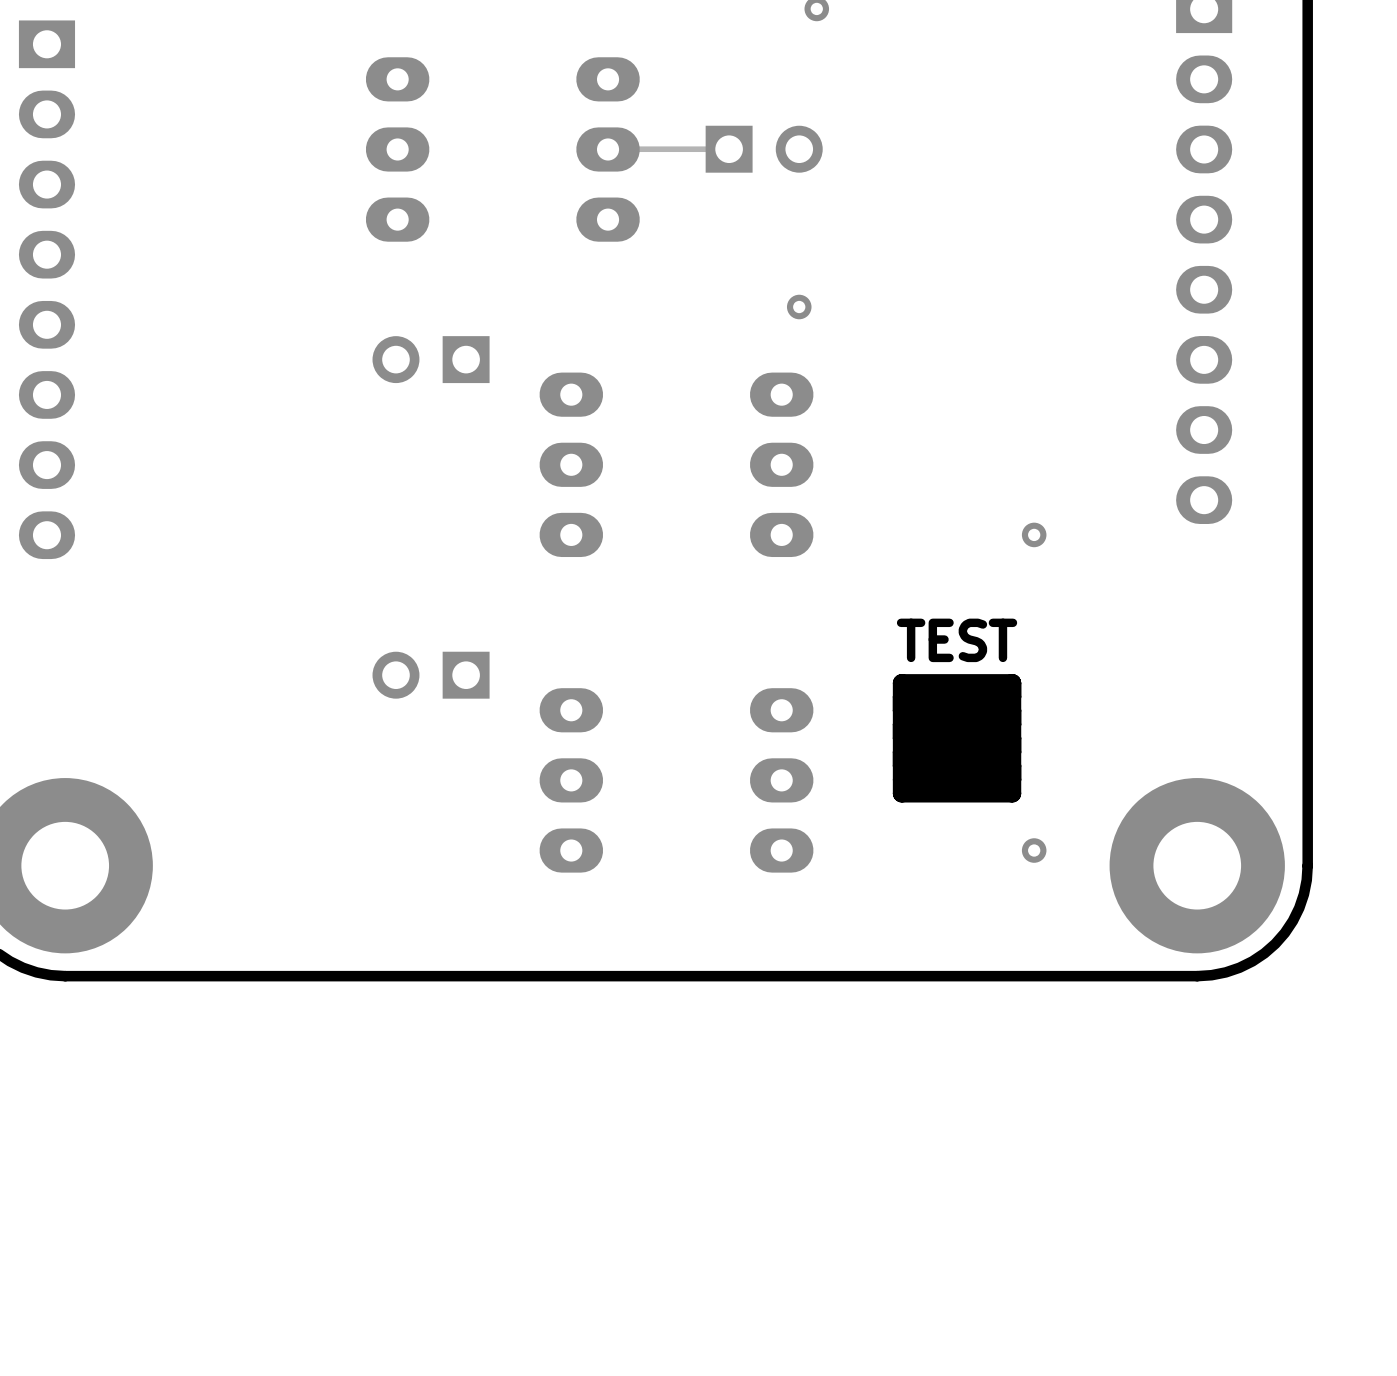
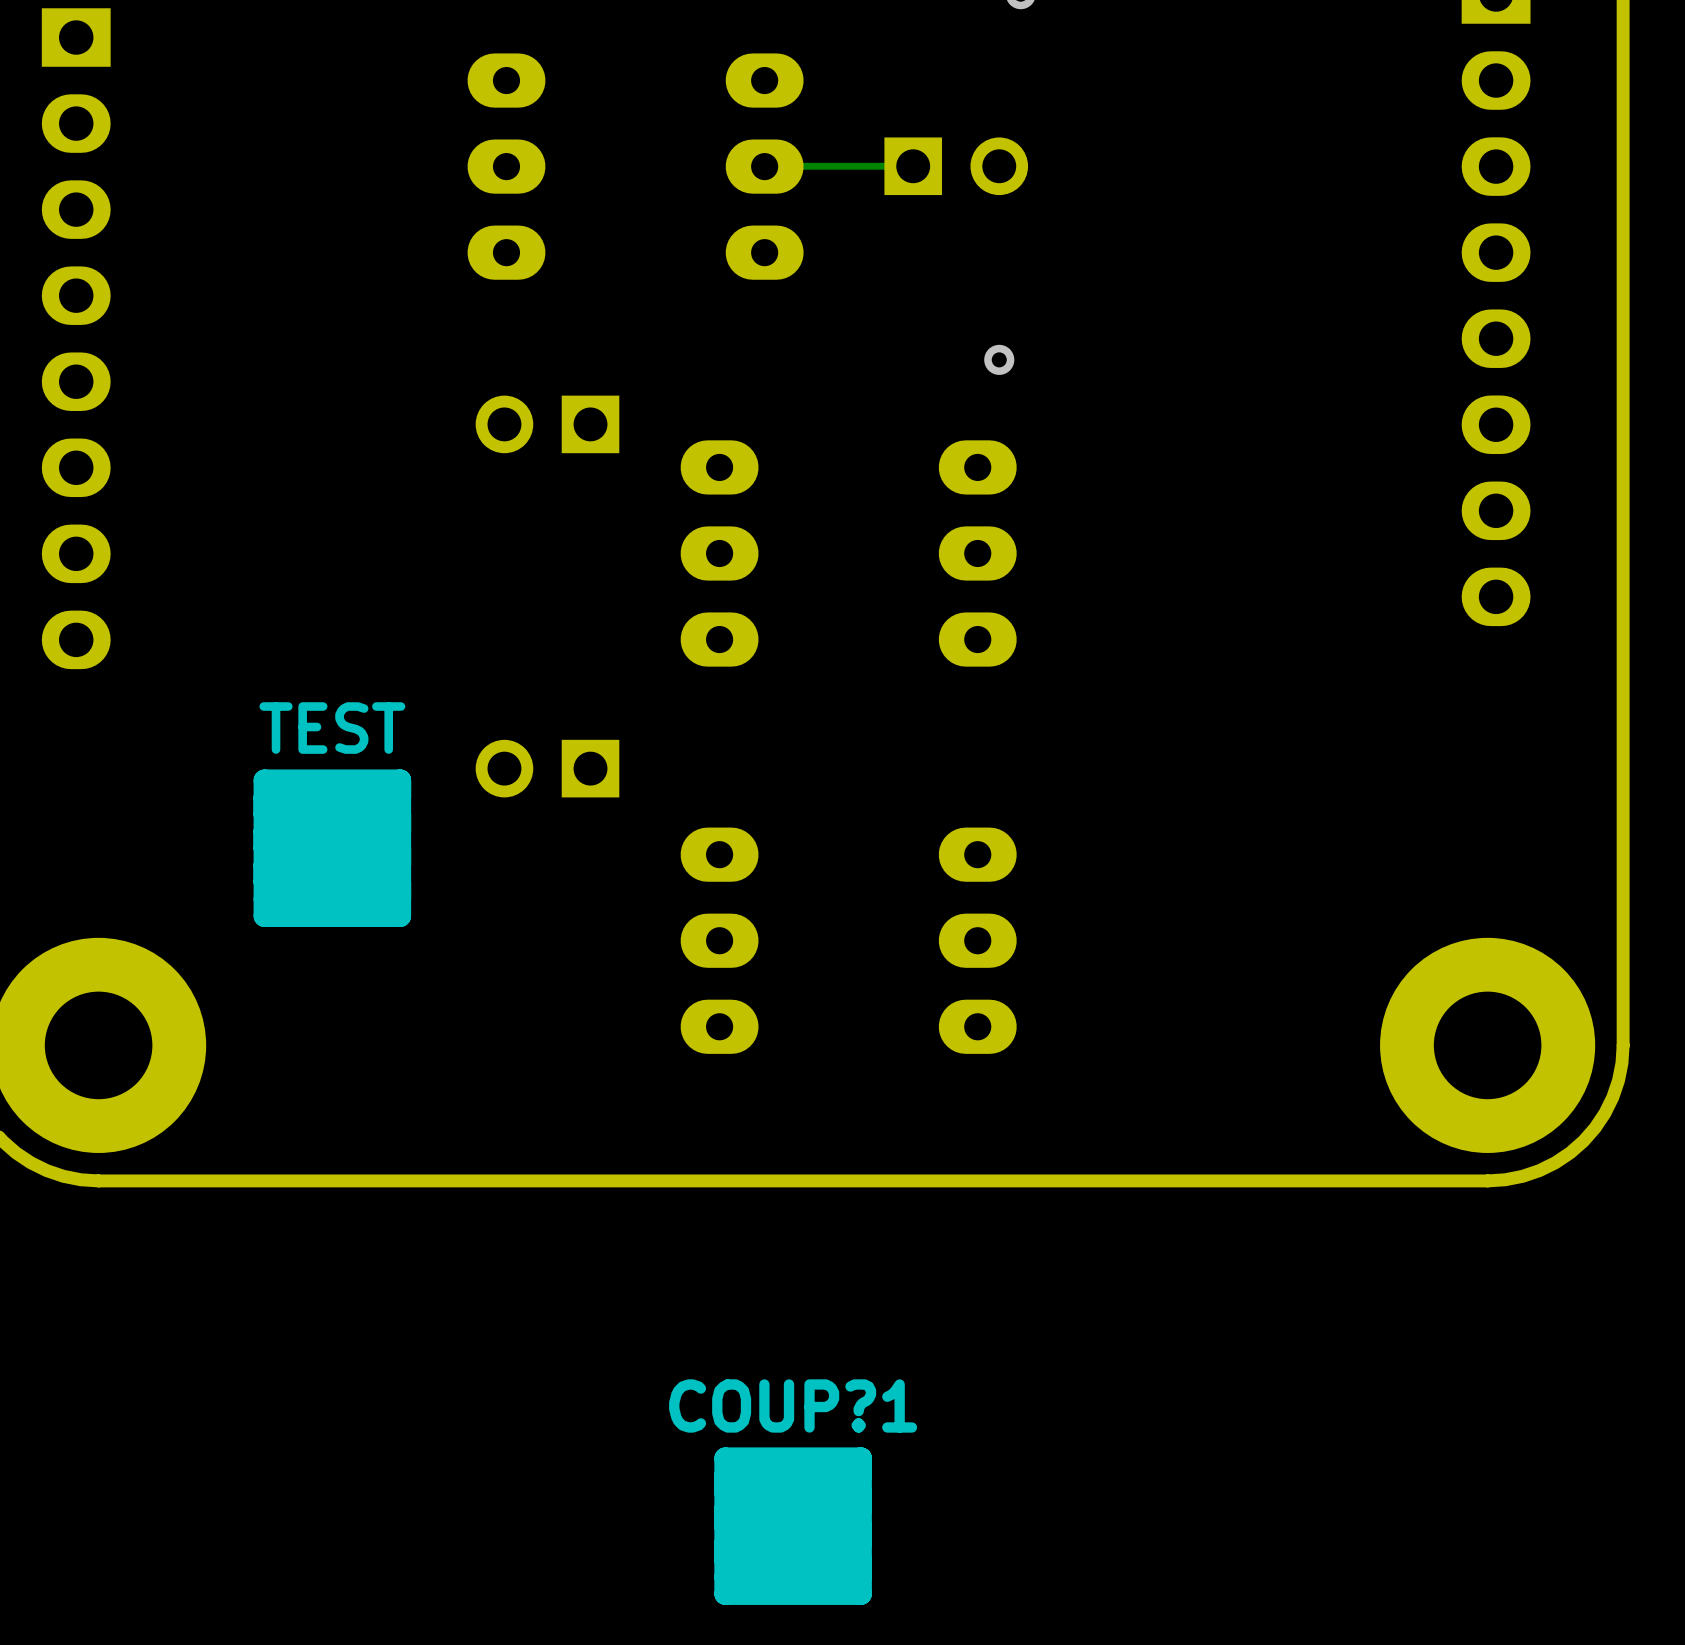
via: (1034, 534) -> none
part position: (431, 675) -> (547, 768)
TEST: none -> (332, 848)
TEST: (957, 738) -> none
via: (1034, 850) -> none
COUP?1: none -> (793, 1526)

